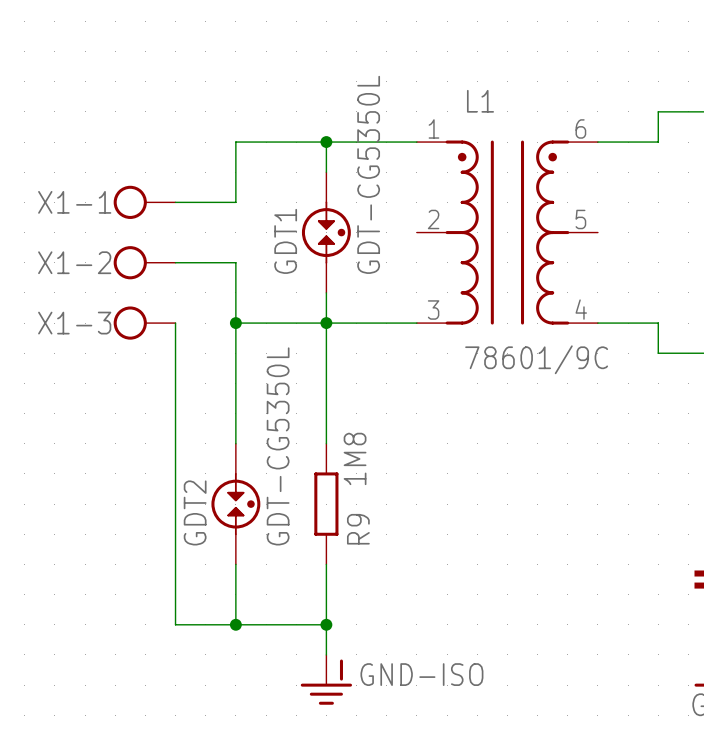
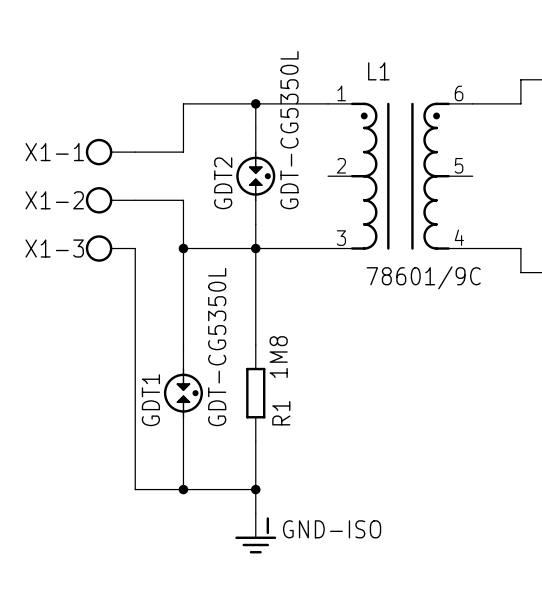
GDT1 name: GDT1 (285, 241) -> GDT2 (223, 183)
GDT2 name: GDT2 (195, 512) -> GDT1 (150, 400)
R9 name: R9 (358, 529) -> R1 (281, 413)

